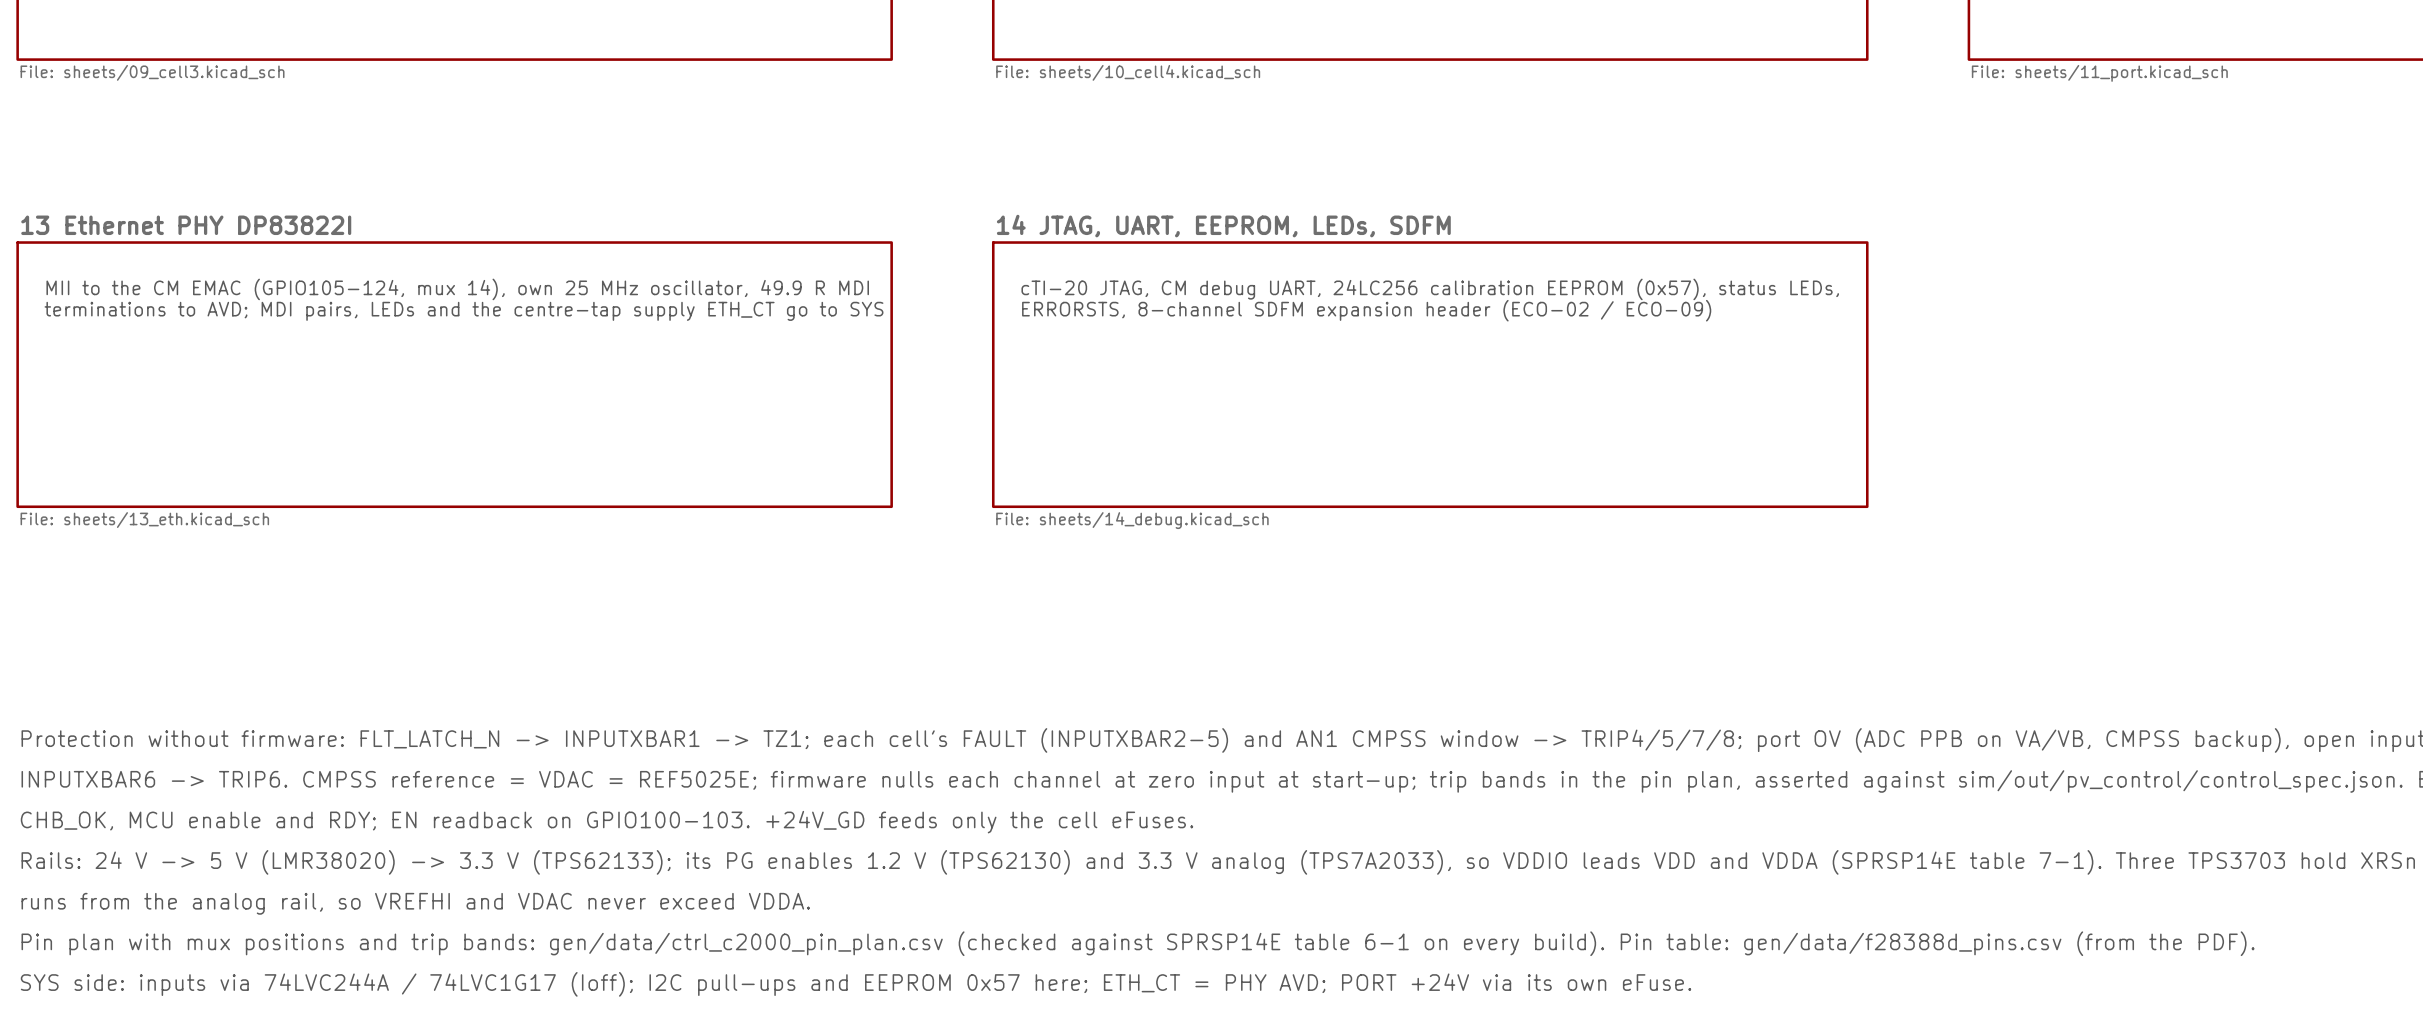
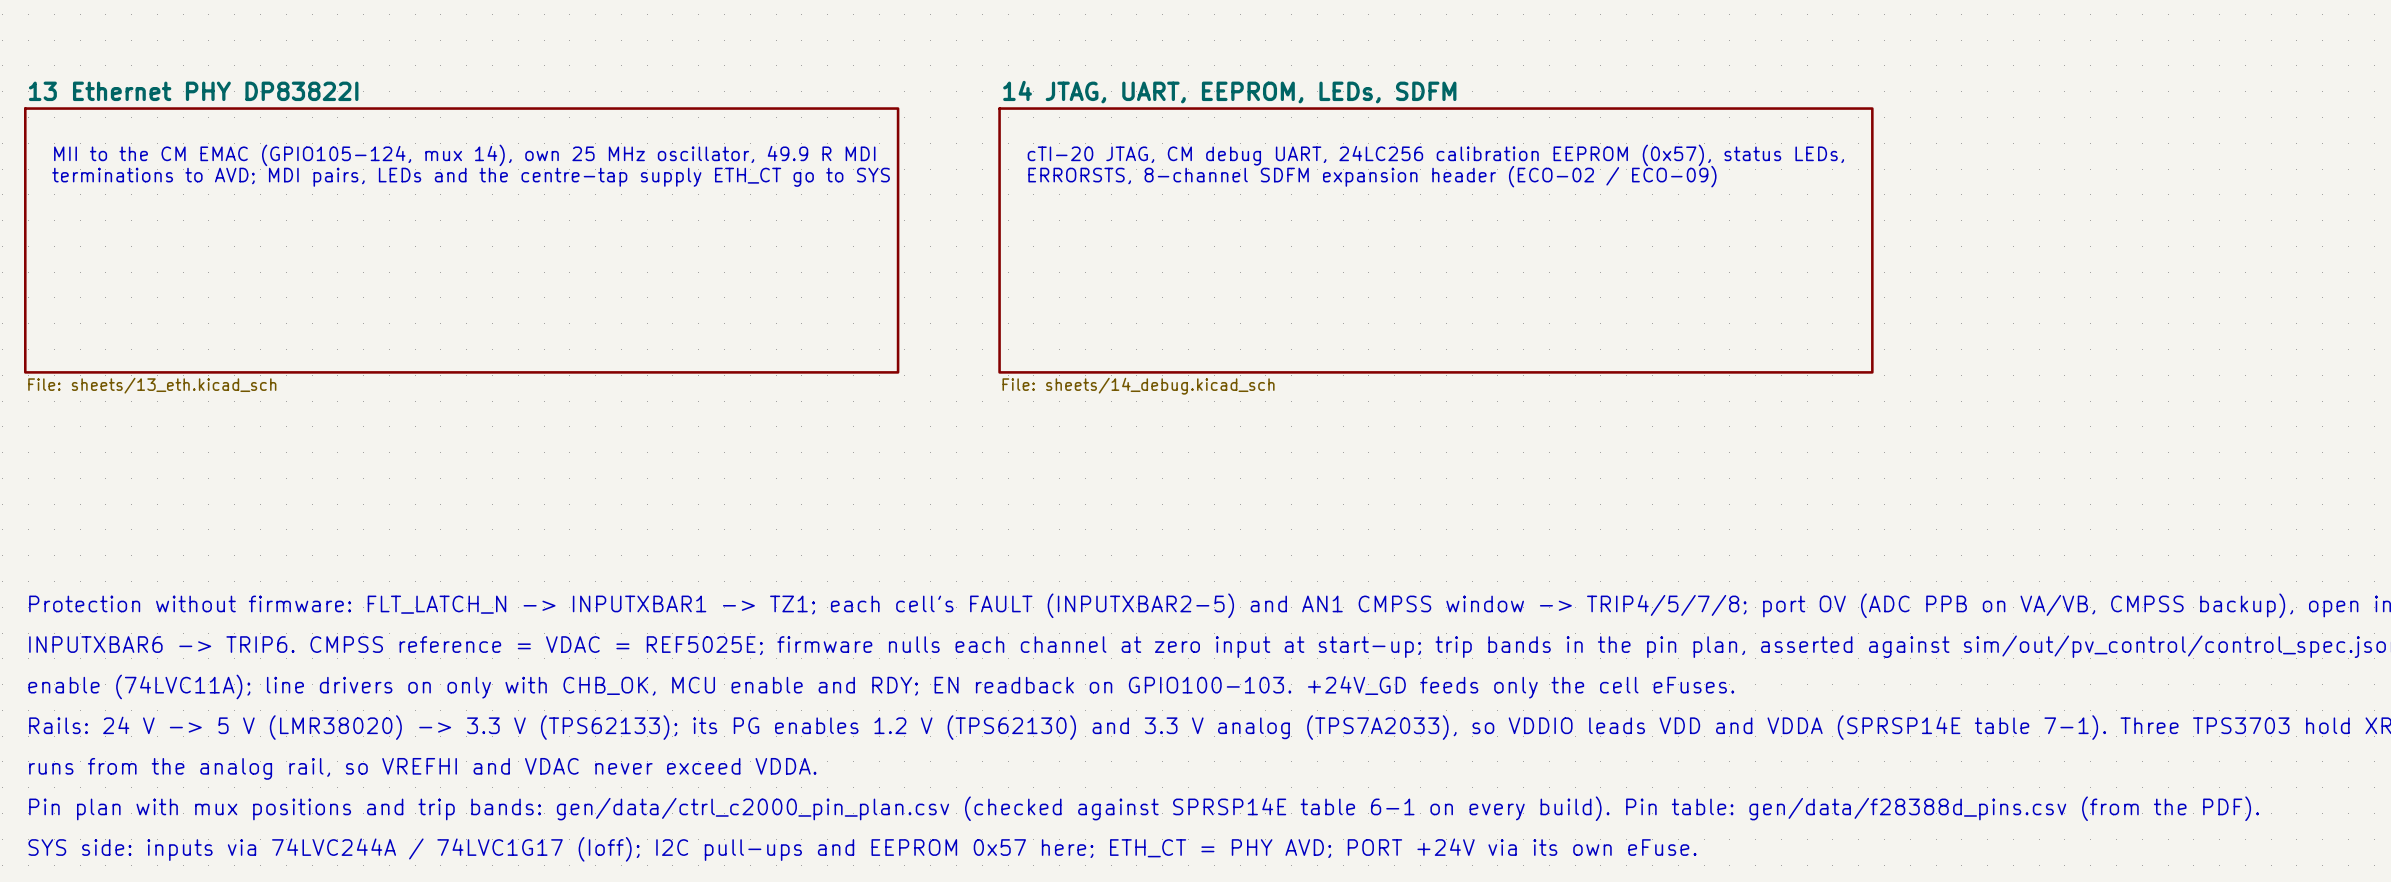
text: CHB_OK, MCU enable and RDY; EN readback on GPIO100-103. +24V_GD feeds only the cell eFuses. (607, 822) -> enable (74LVC11A); line drivers on only with CHB_OK, MCU enable and RDY; EN readback on GPIO100-103. +24V_GD feeds only the cell eFuses. (881, 686)

